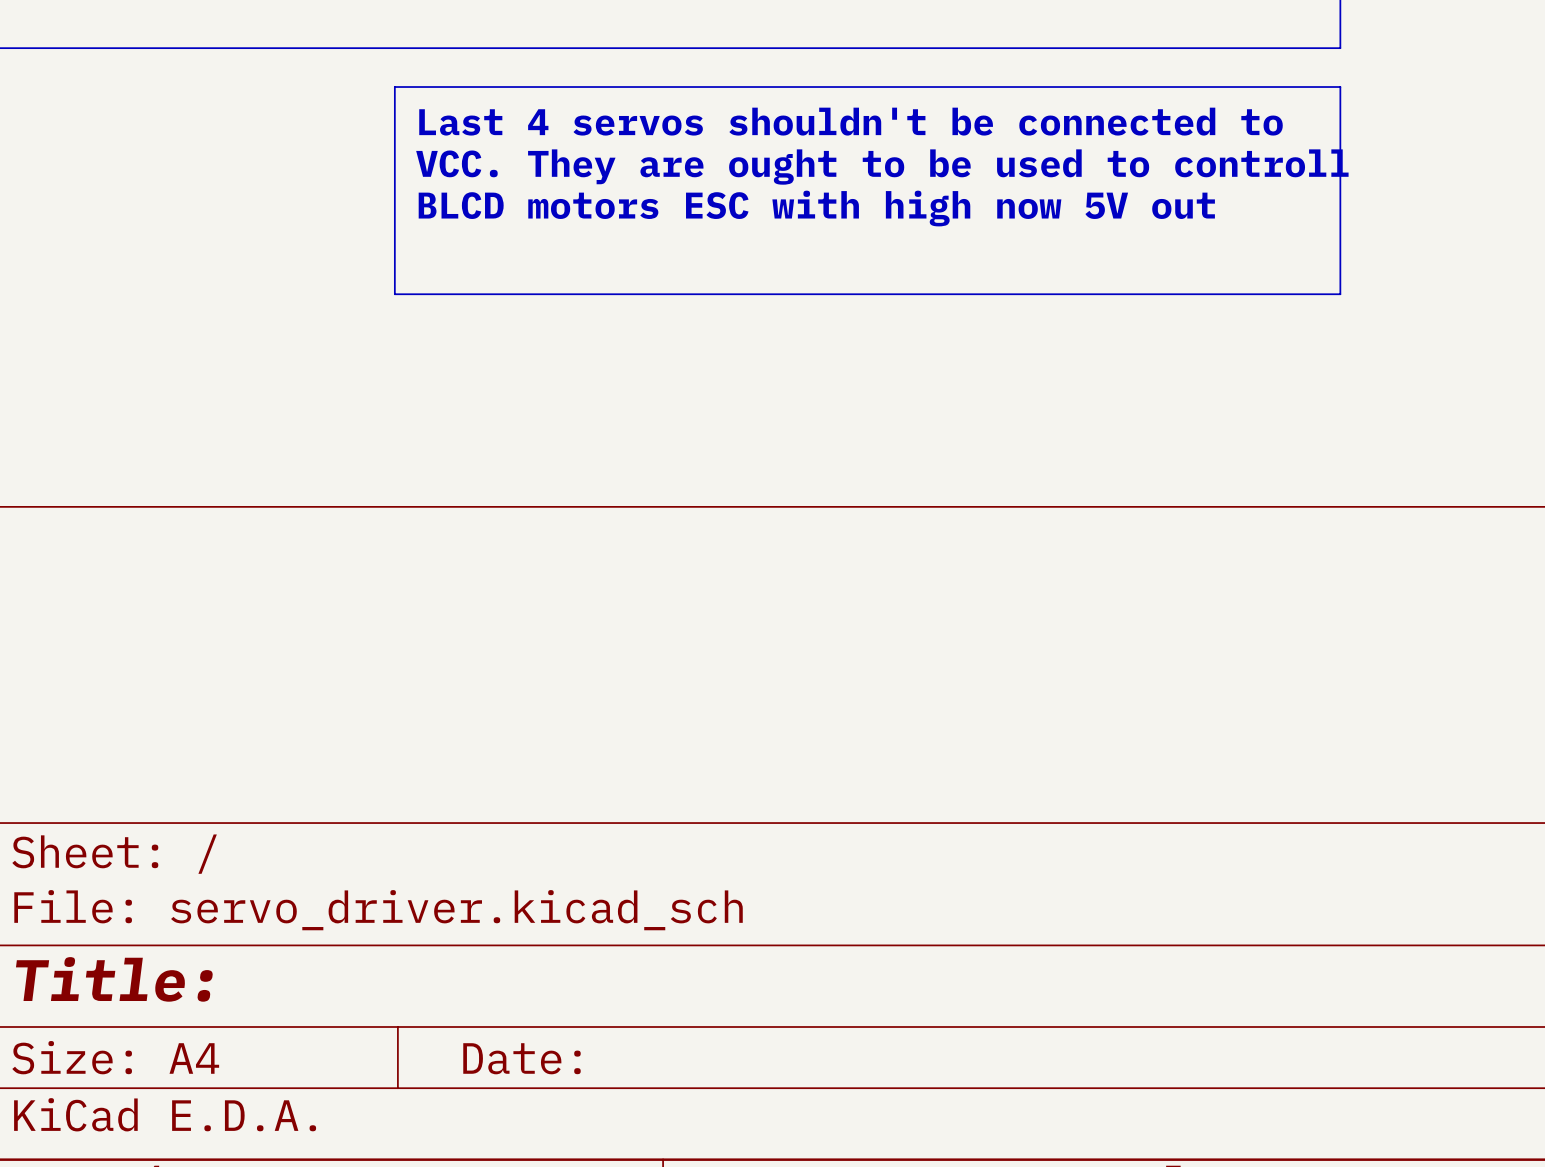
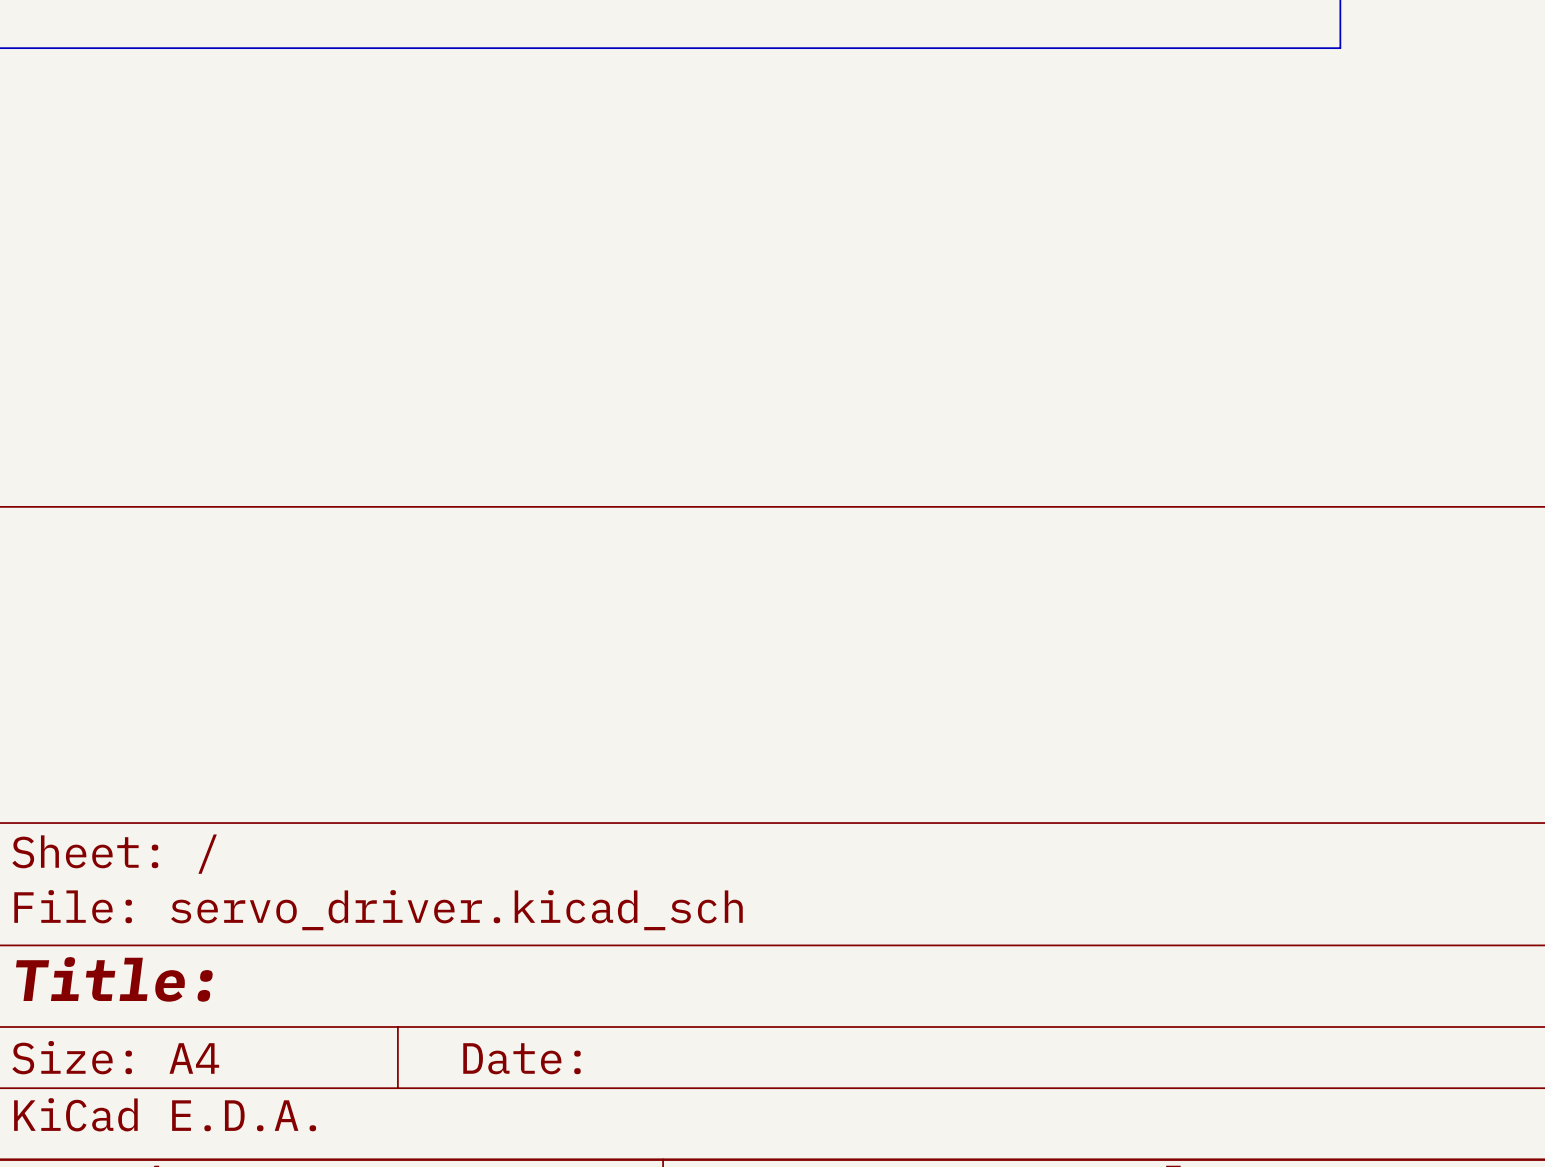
line: (394, 87) (1340, 87) (1340, 294) (394, 294) (394, 87) -> none
text: Last 4 servos shouldn't be connected to (851, 121) -> none
text: VCC. They are ought to be used to controll (882, 167) -> none
text: BLCD motors ESC with high now 5V out (816, 208) -> none

